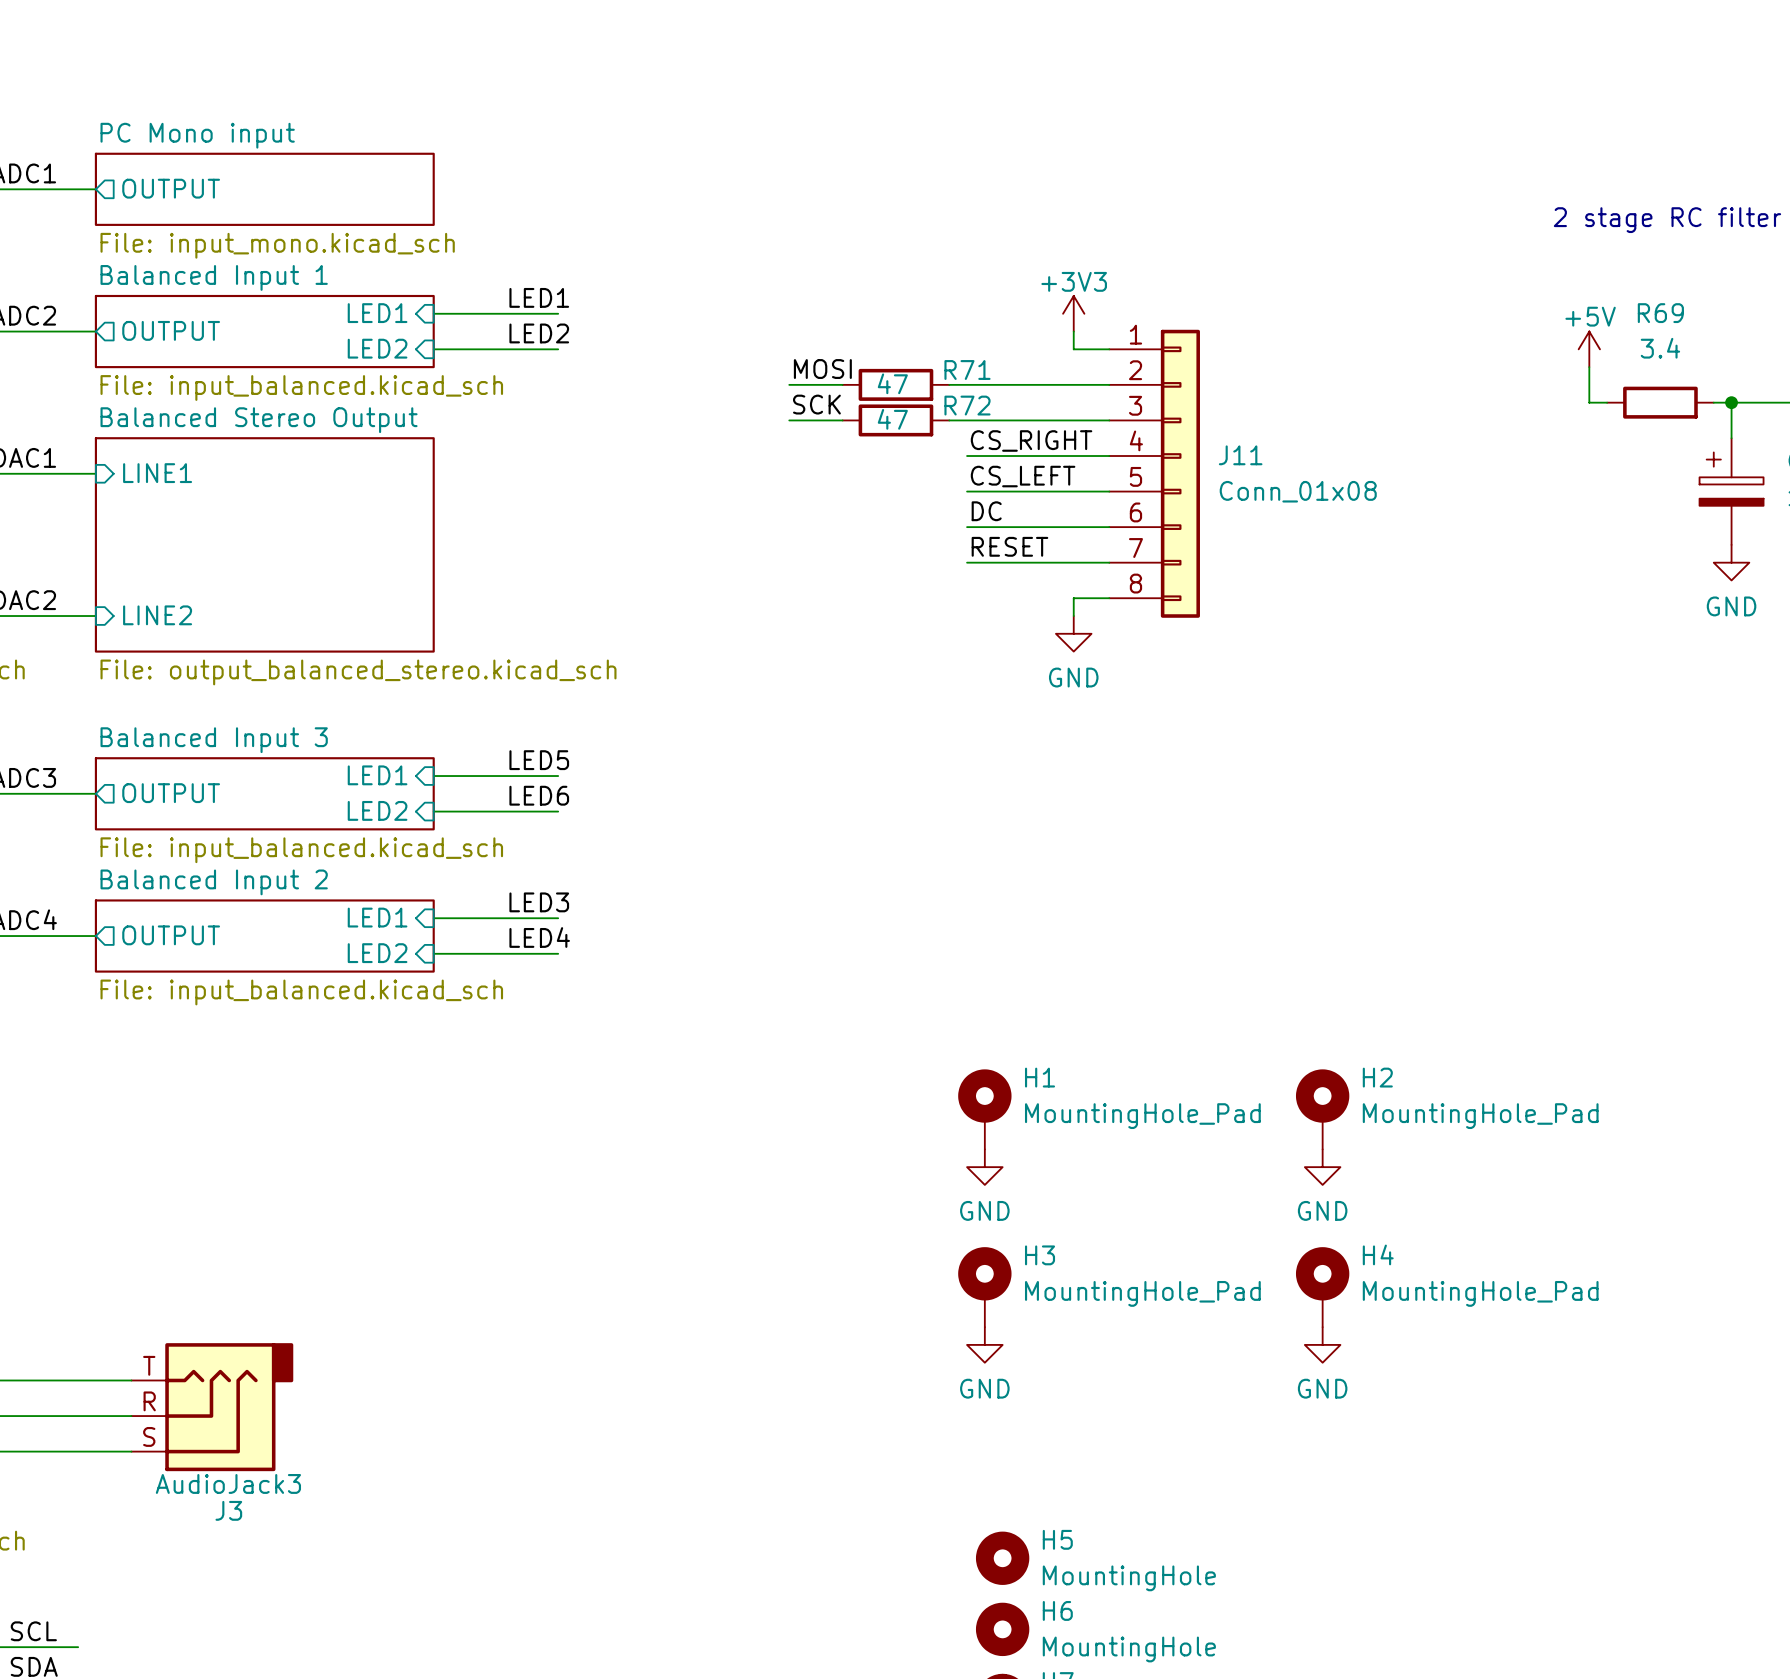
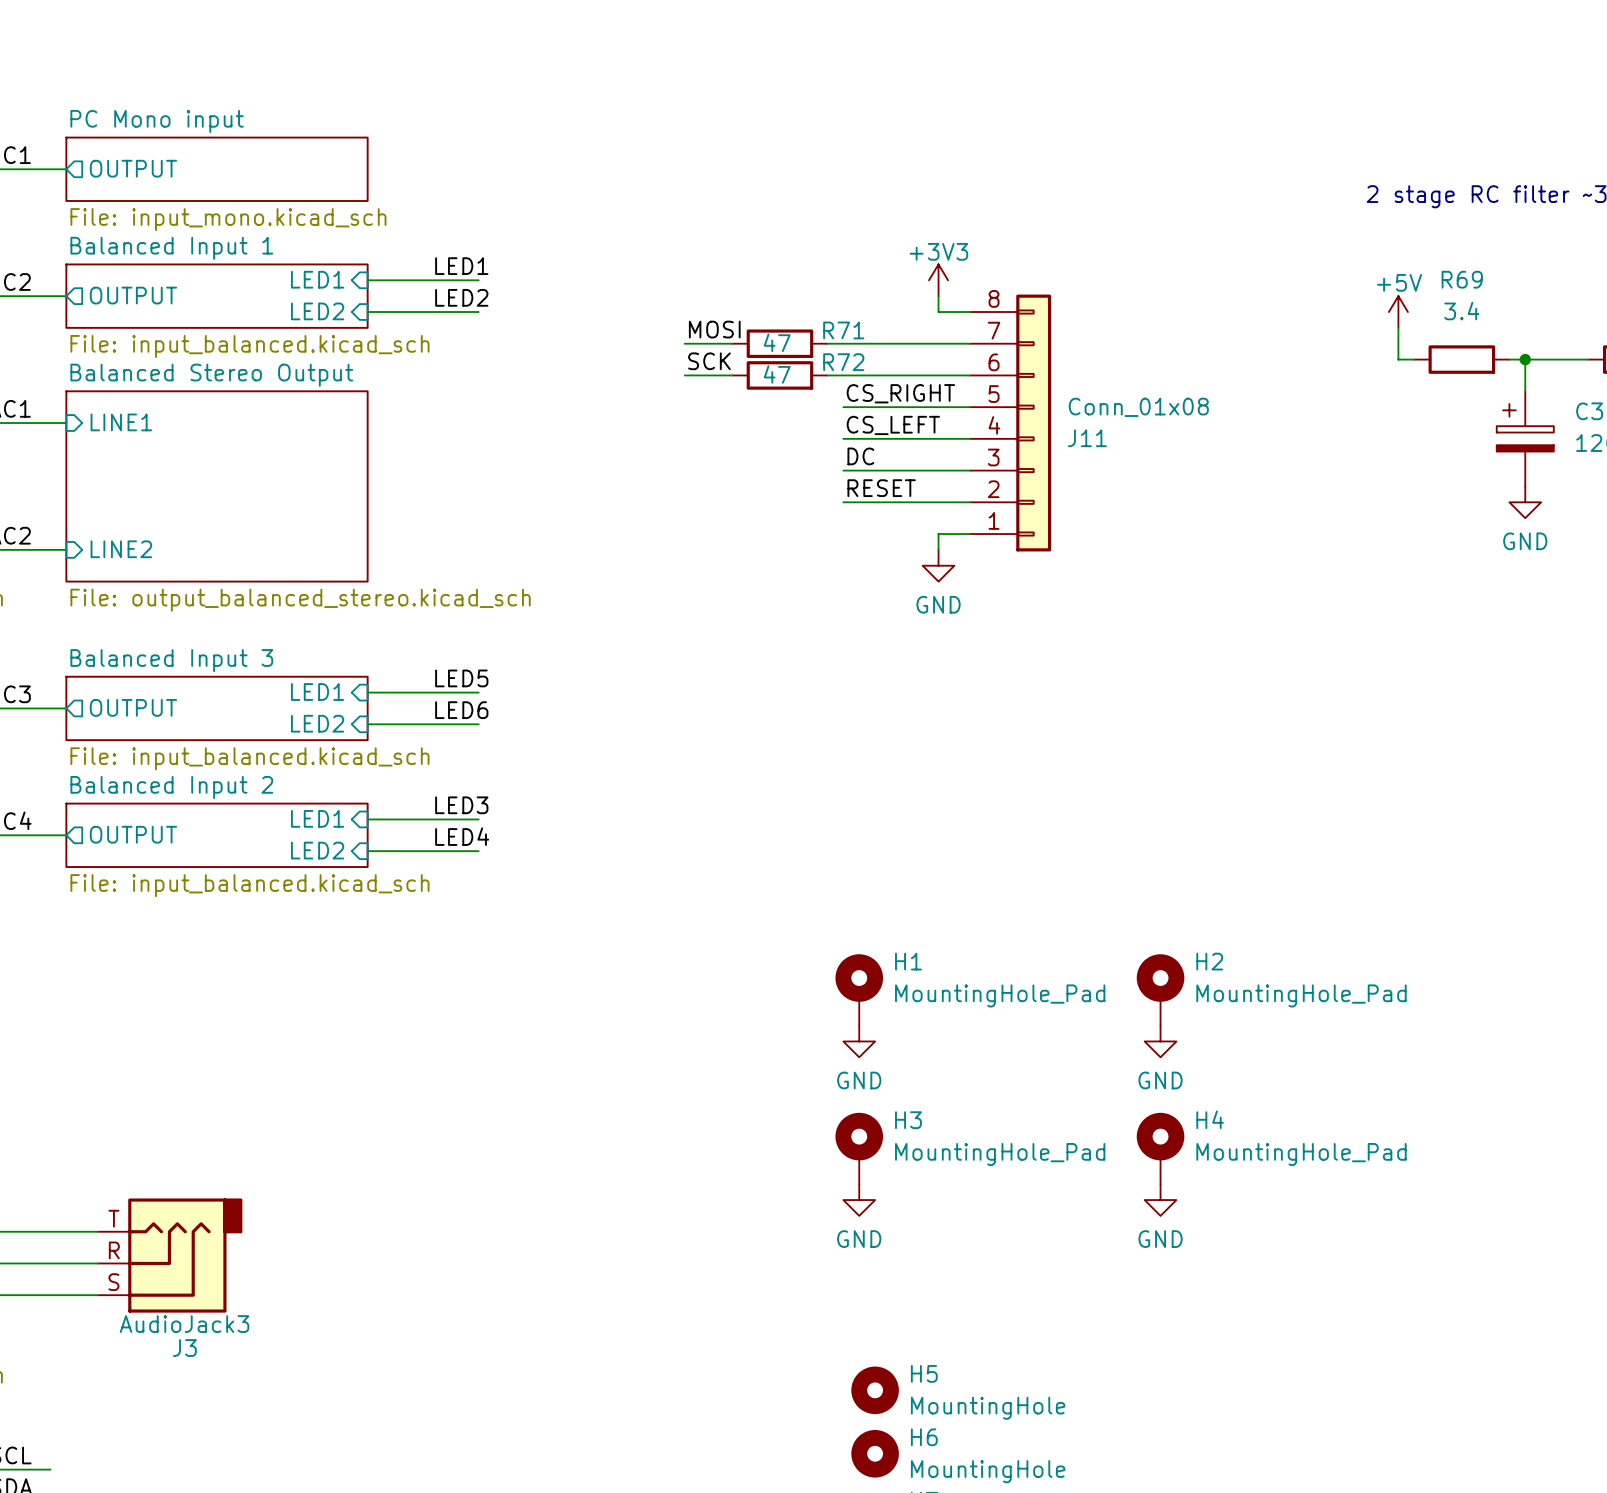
J11 flip: as is (1180, 473) -> up-down (1033, 423)

